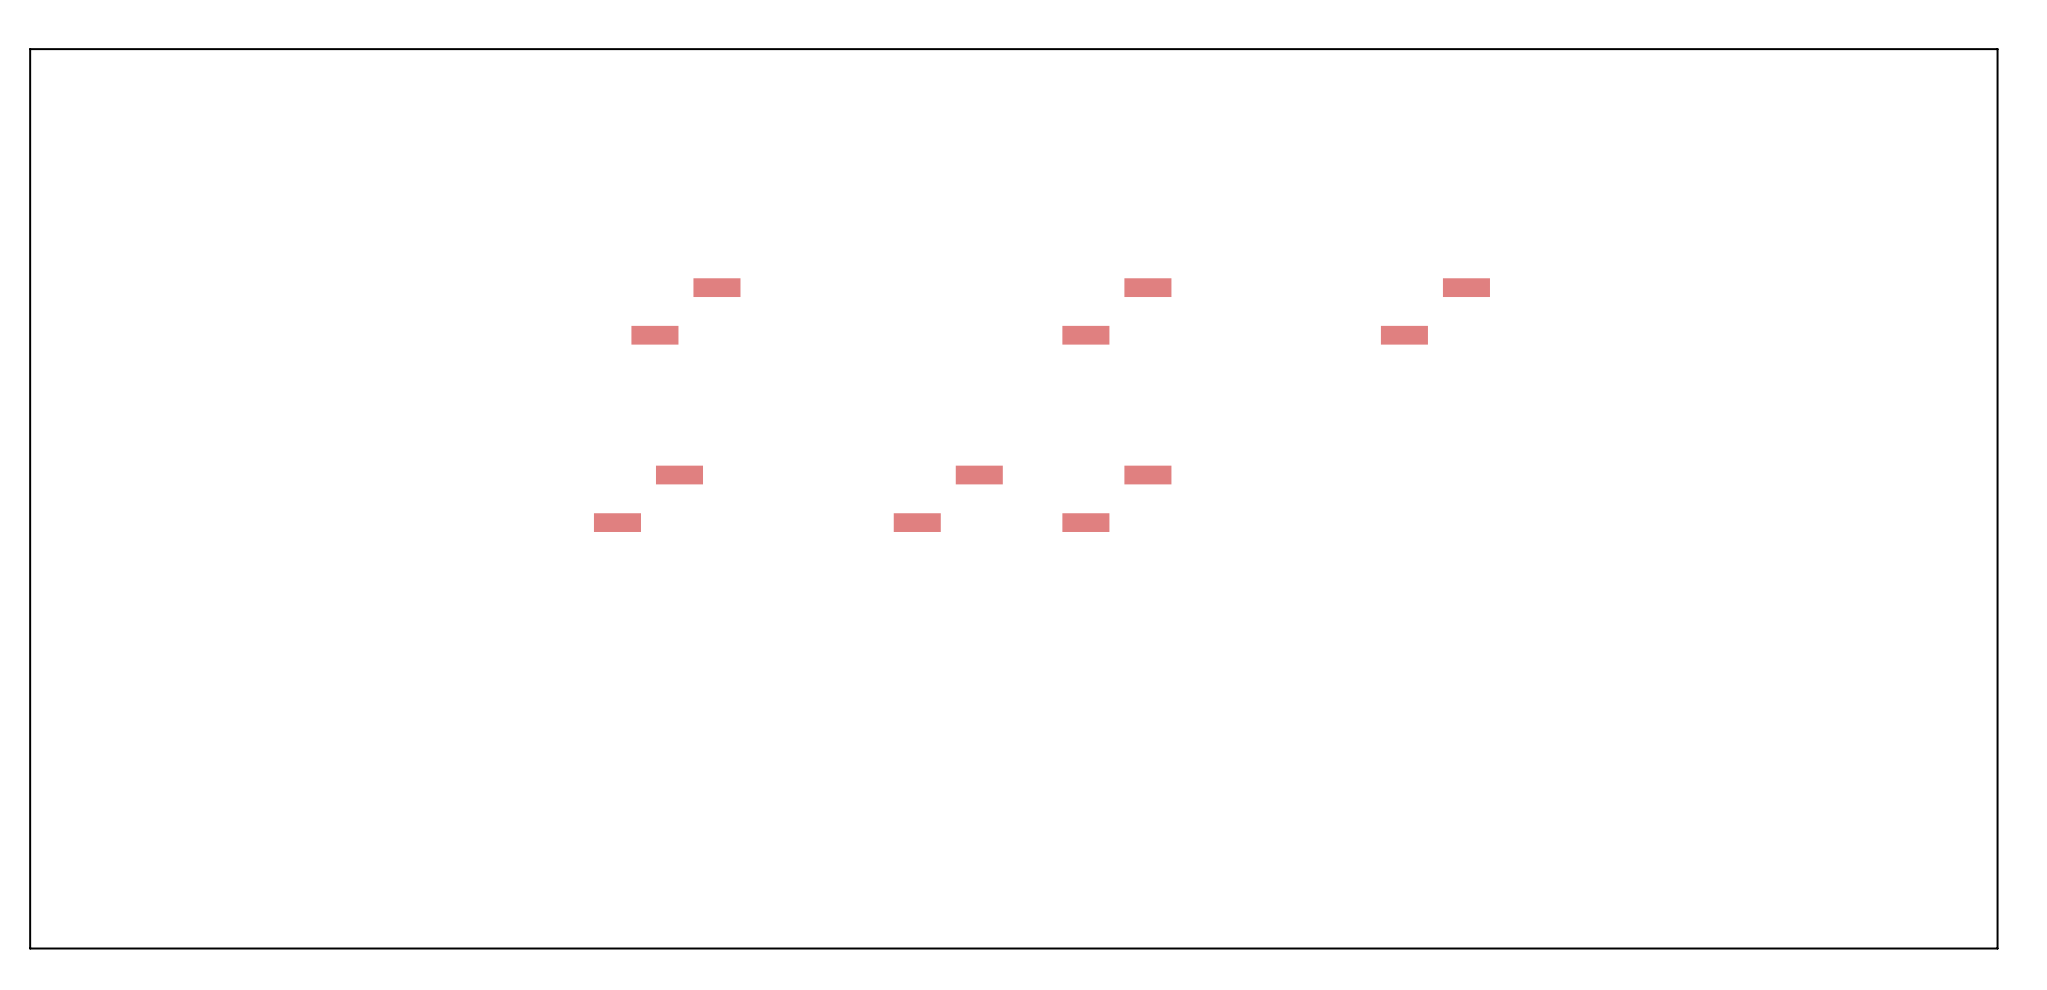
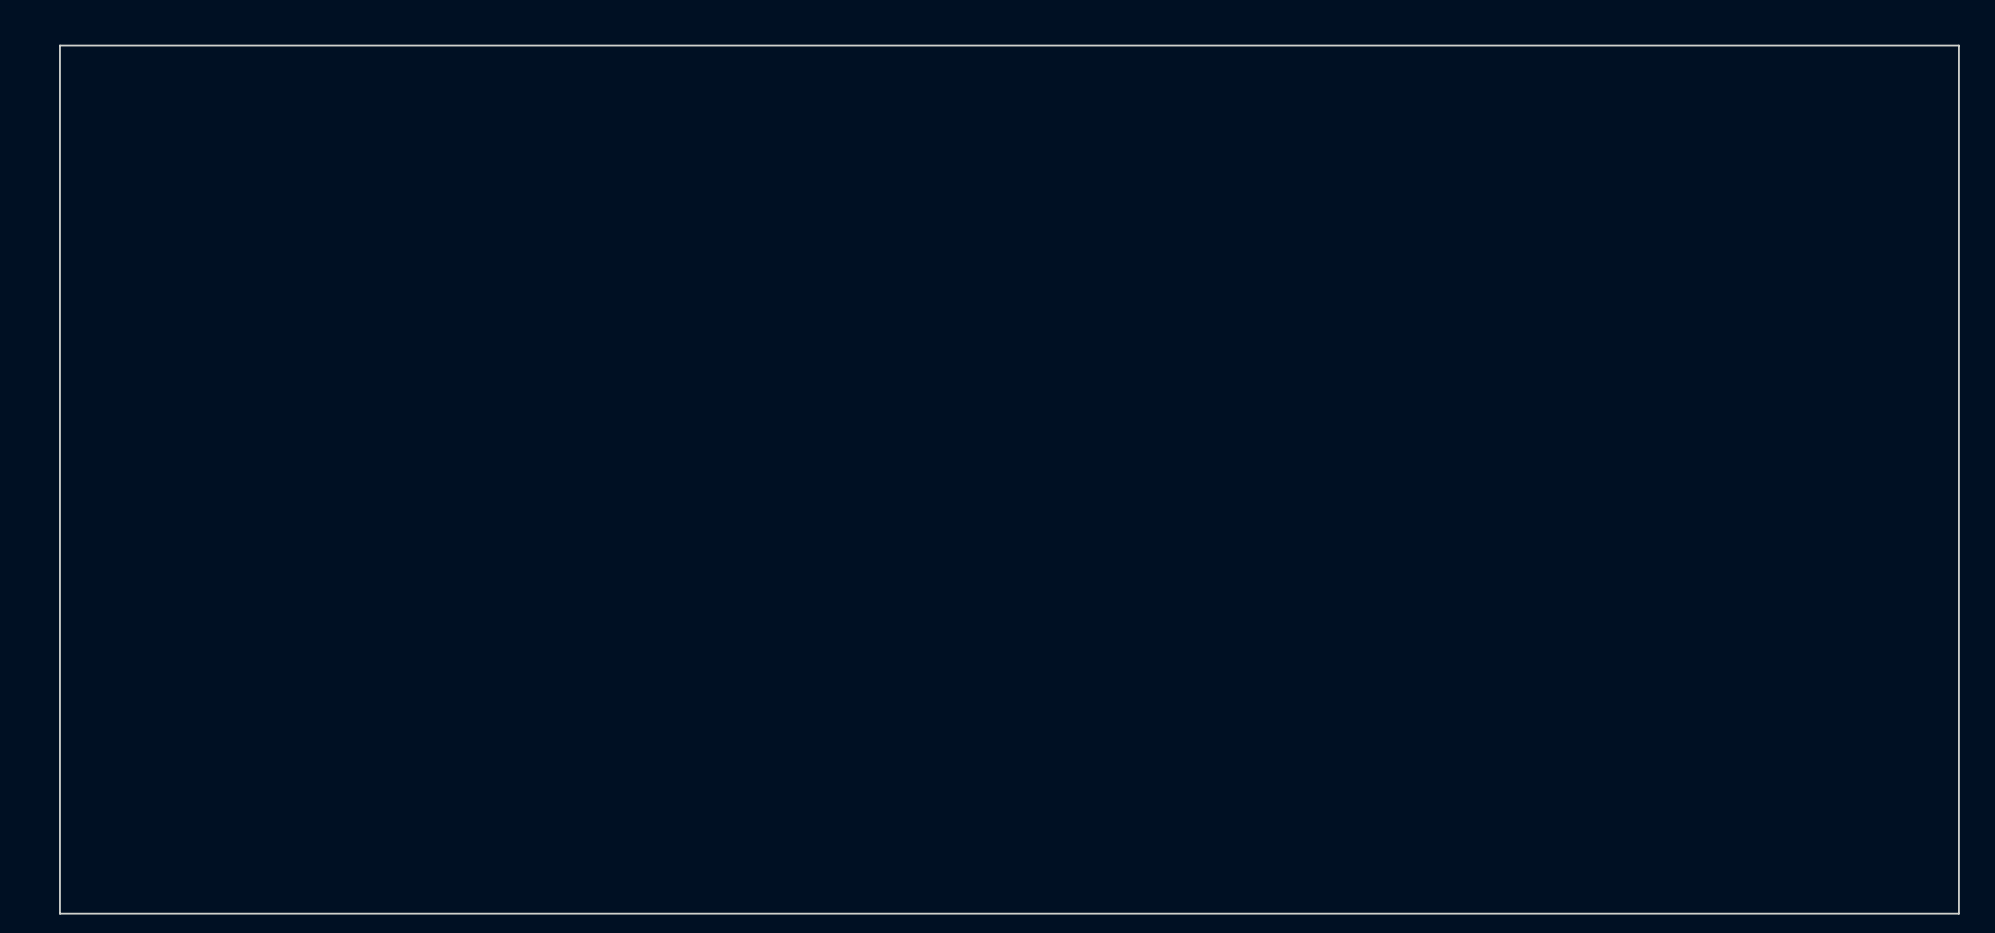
part: (685, 311) -> none
part: (1116, 311) -> none
part: (1435, 311) -> none
part: (648, 498) -> none
part: (948, 498) -> none
part: (1116, 498) -> none

